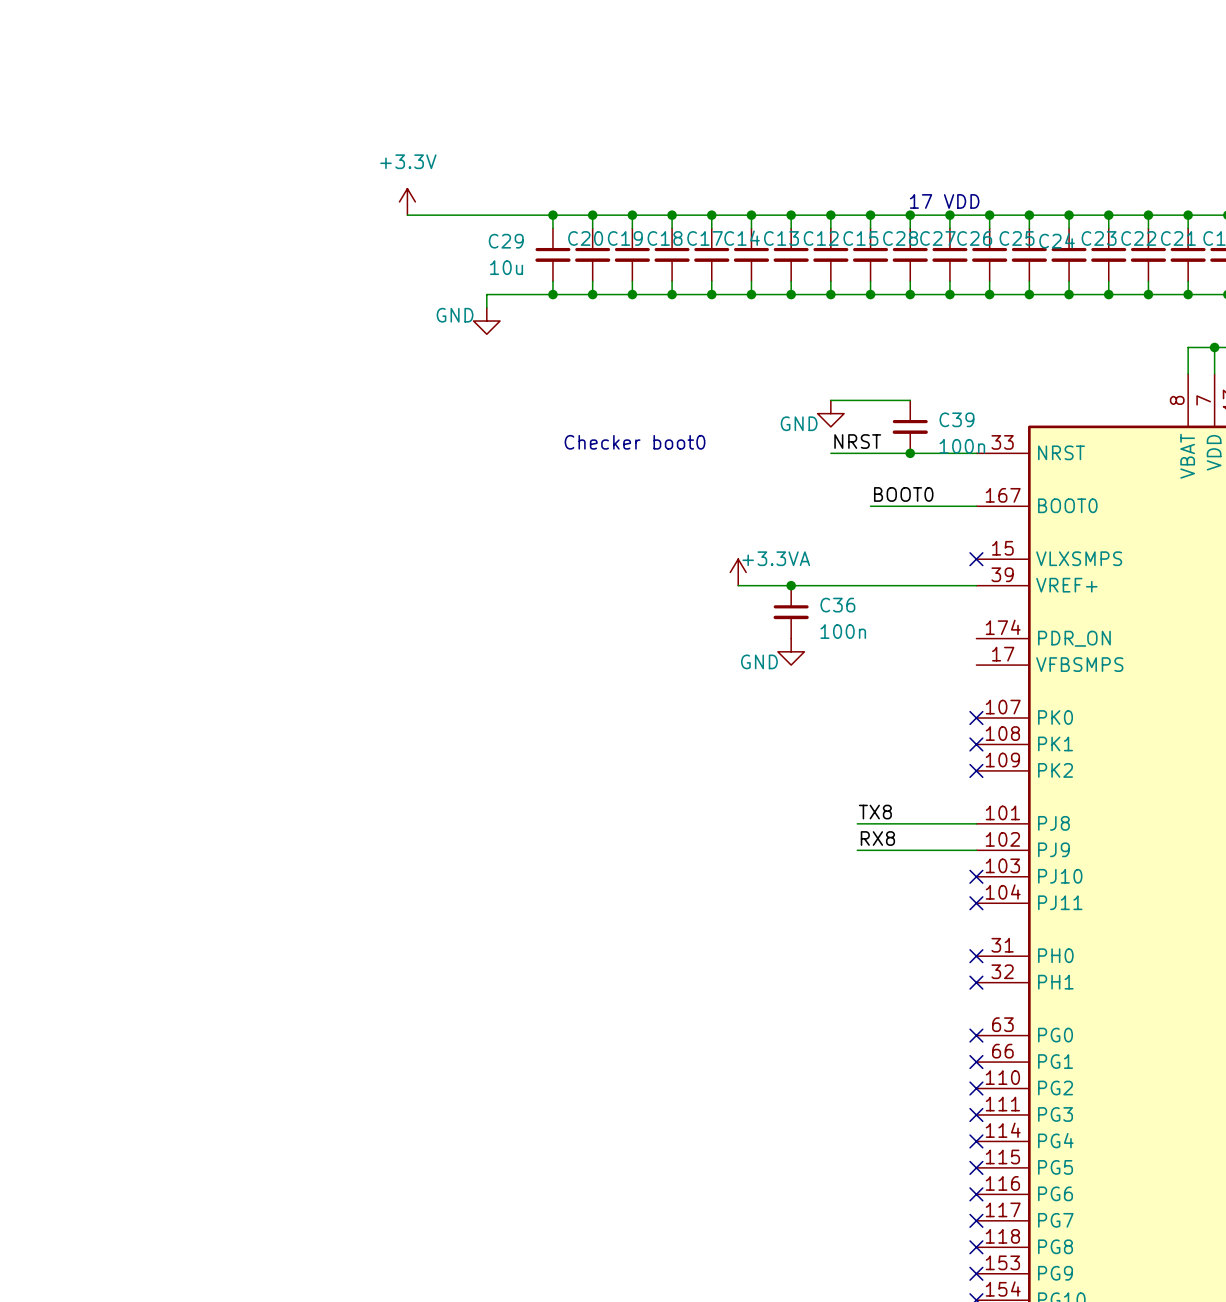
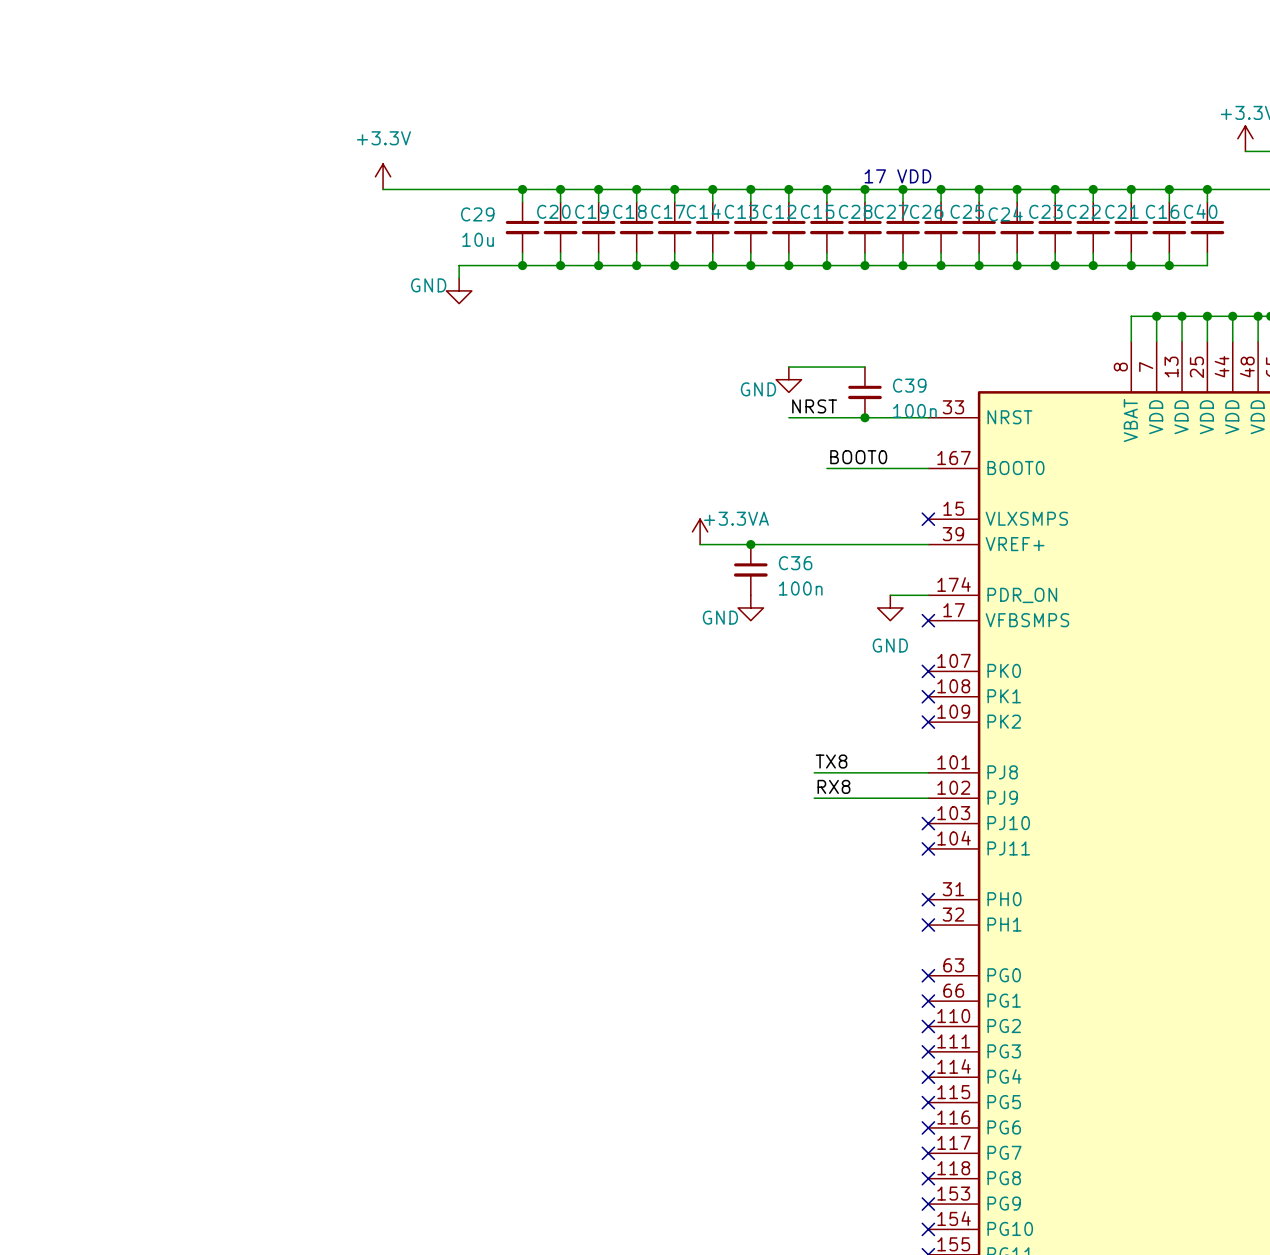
text: Checker boot0 (635, 442) -> none
wire: none -> (890, 595) (928, 595)
power symbol: none -> GND (890, 607)
no-connect mark: none -> (928, 620)

